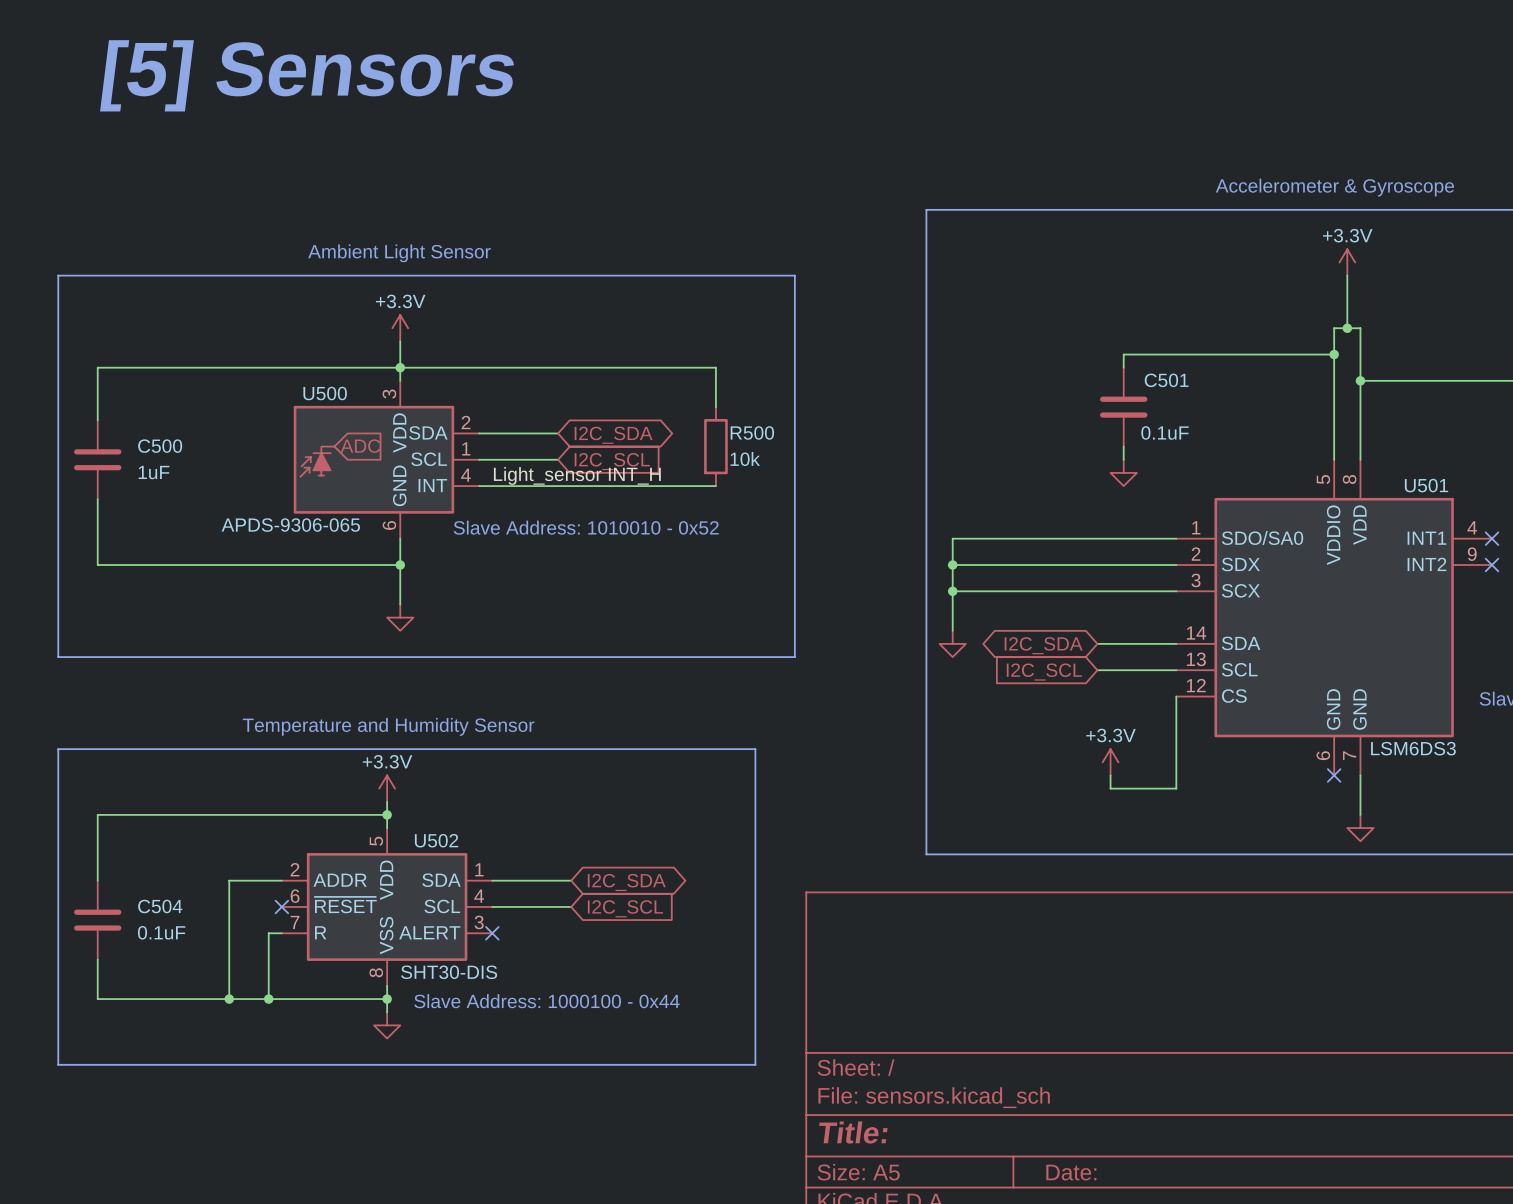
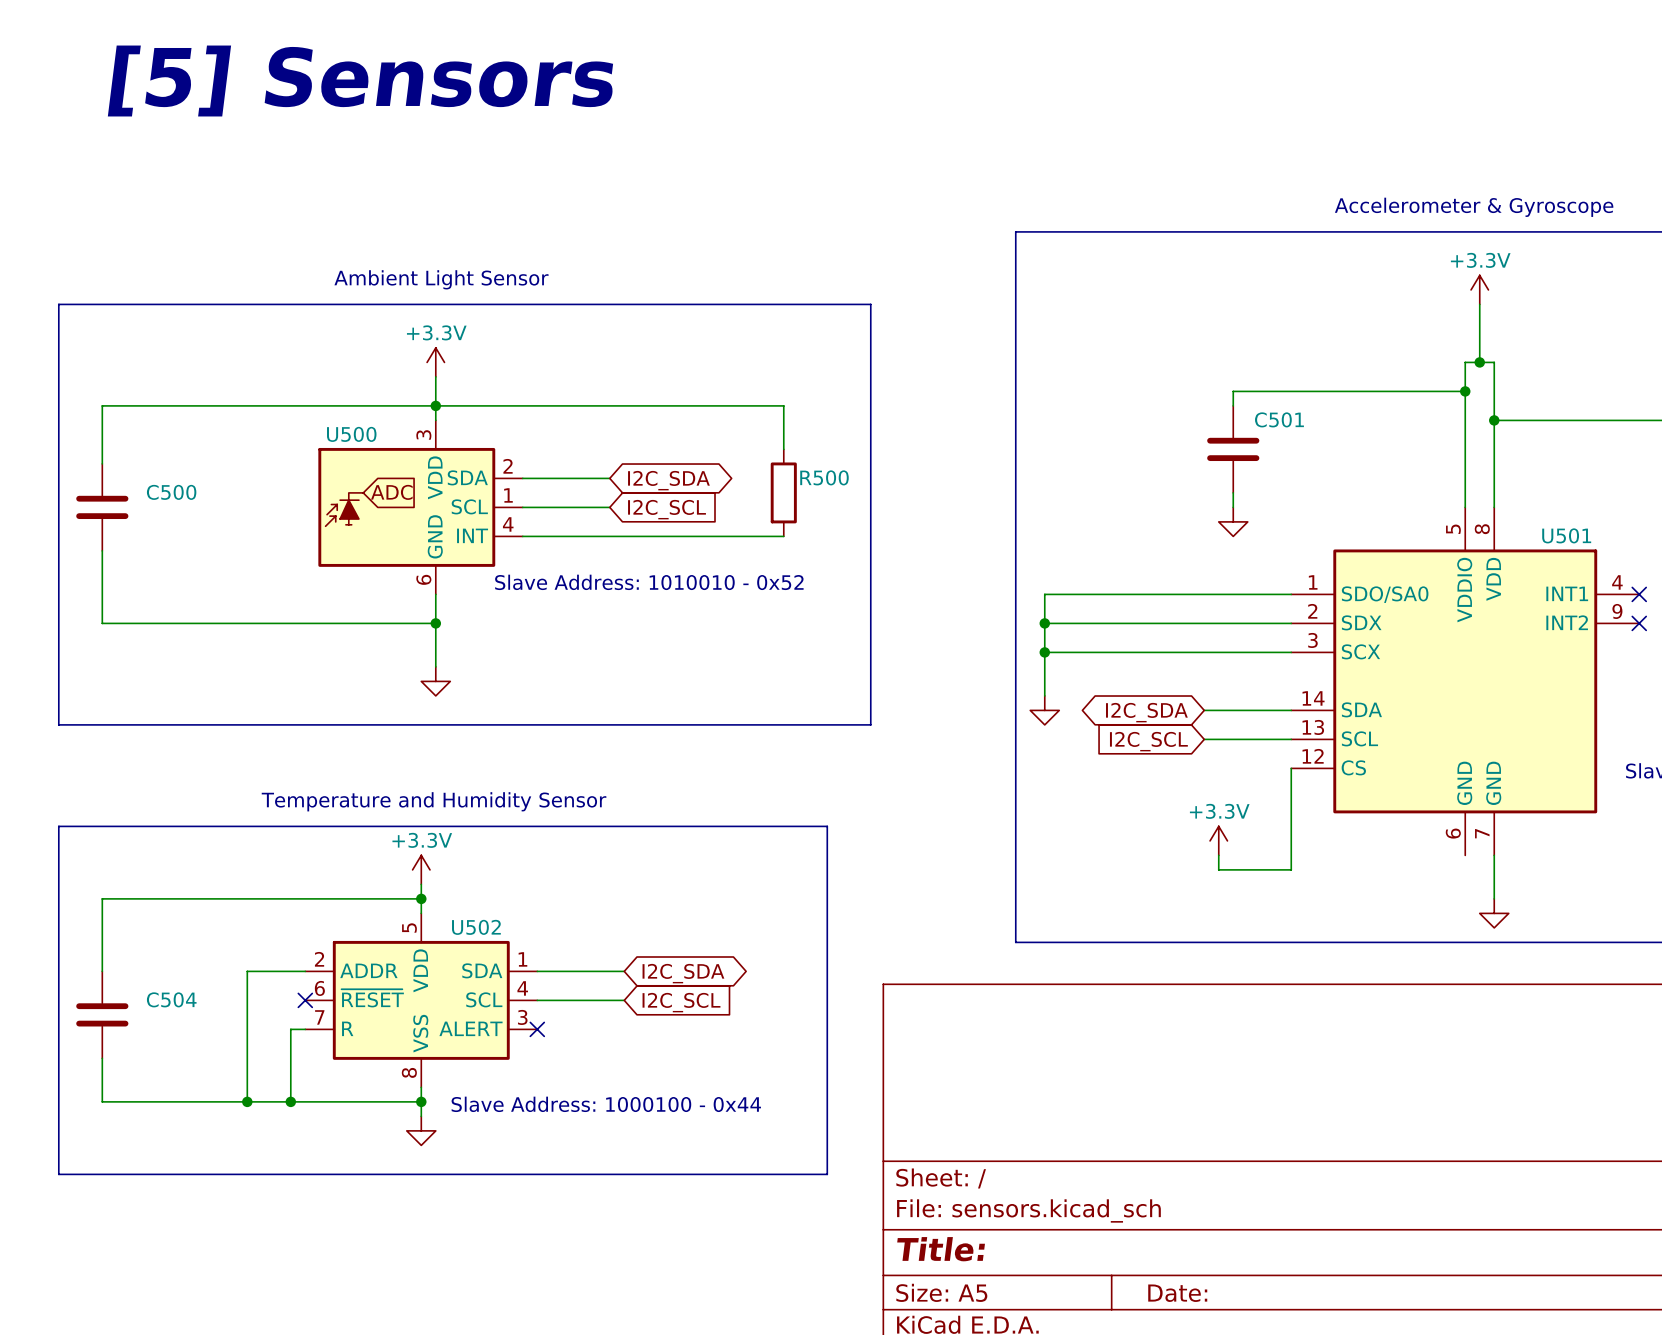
C501 value: 0.1uF (1165, 432) -> none
R500 value: 10k (745, 459) -> none
C500 value: 1uF (154, 472) -> none
label: Light_sensor INT_H (577, 475) -> none
U500 value: APDS-9306-065 (290, 525) -> none
U501 value: LSM6DS3 (1413, 748) -> none
no-connect mark: (1334, 775) -> none
C504 value: 0.1uF (161, 932) -> none
U502 value: SHT30-DIS (449, 972) -> none

